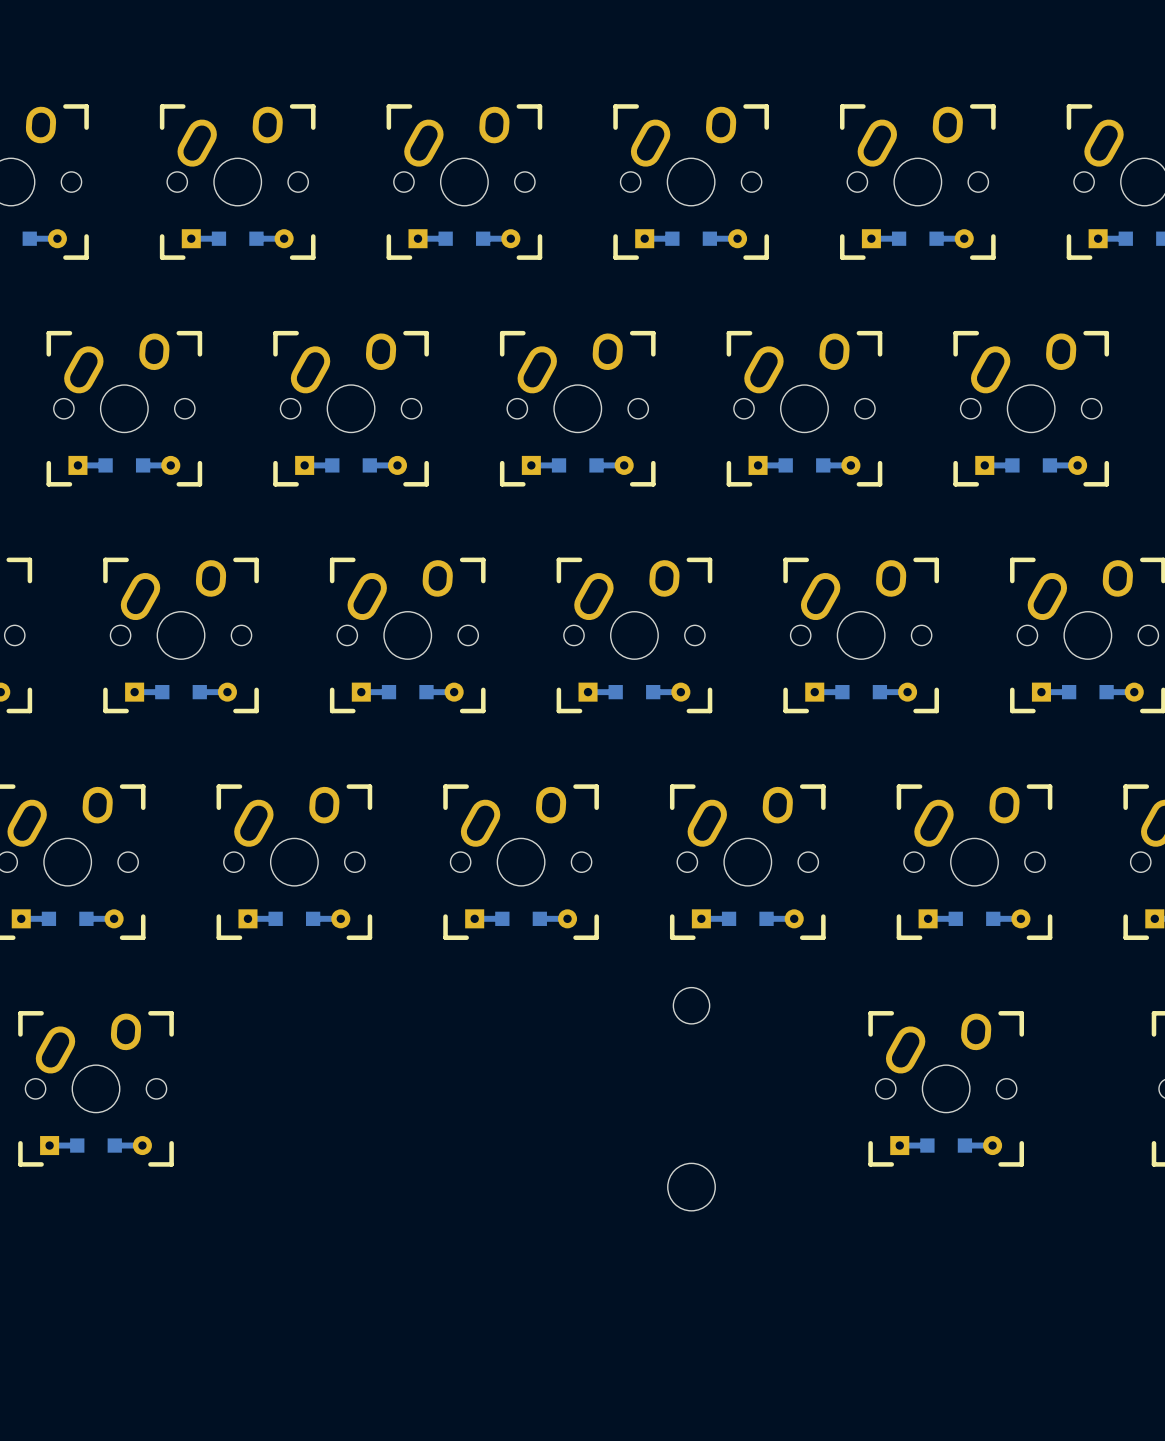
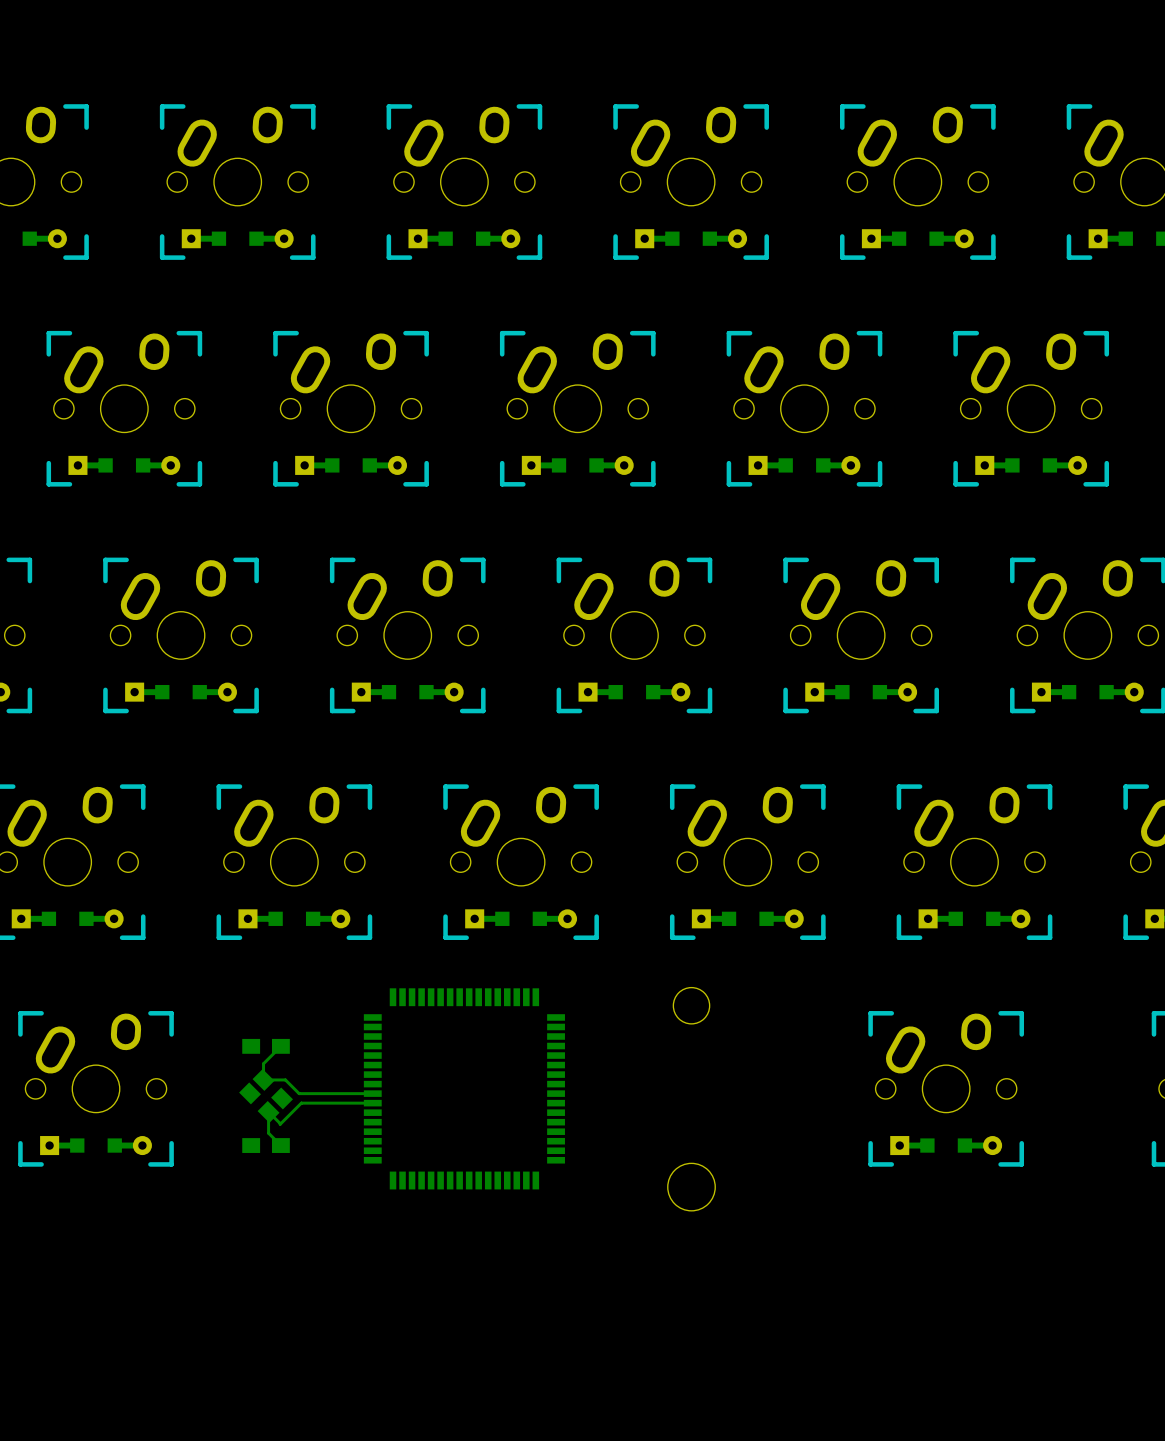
part: none -> (266, 1046)
bottom track: none -> (280, 1046) (263, 1063) (263, 1079) (285, 1079) (299, 1093) (372, 1093)
part: none -> (464, 1088)
part: none -> (266, 1095)
bottom track: none -> (372, 1103) (301, 1103) (280, 1124) (268, 1111) (268, 1133) (280, 1145)
part: none -> (266, 1145)

